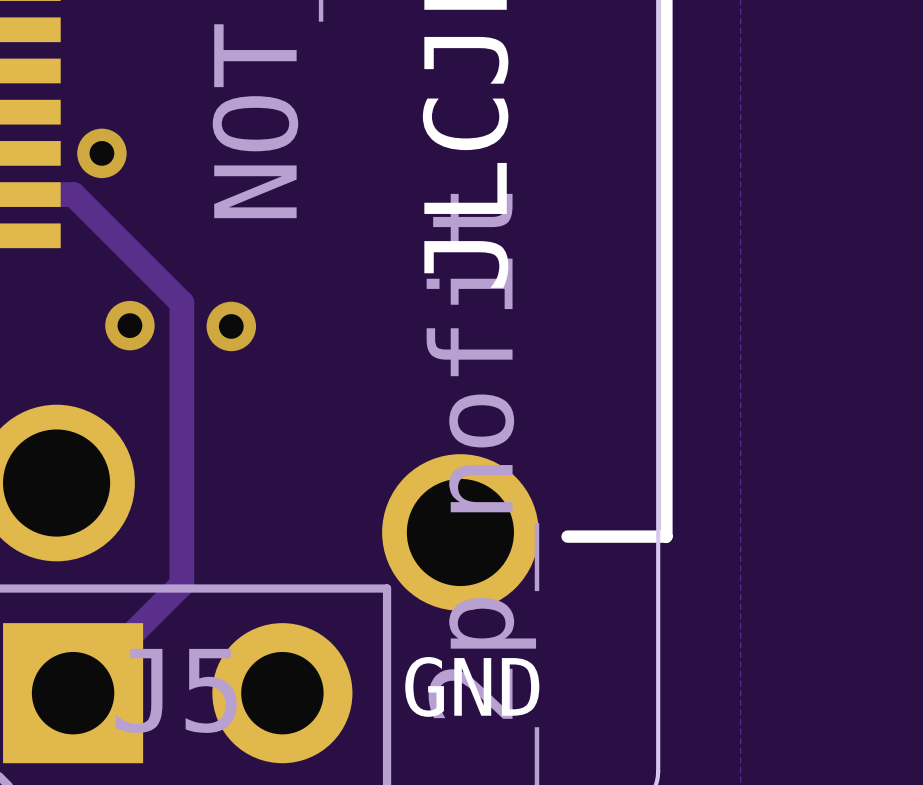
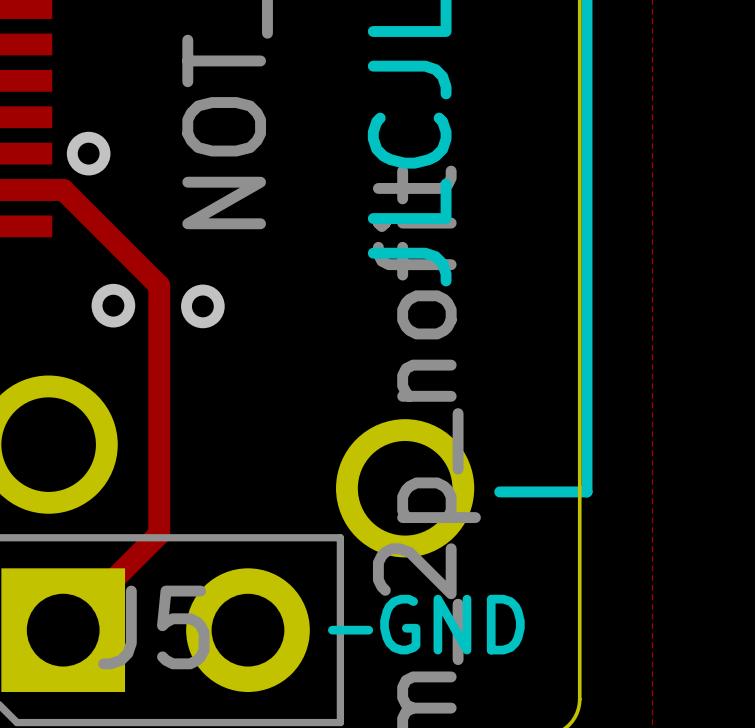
text position: GND (472, 686) -> GND (452, 624)
line: none -> (332, 630) (368, 630)

